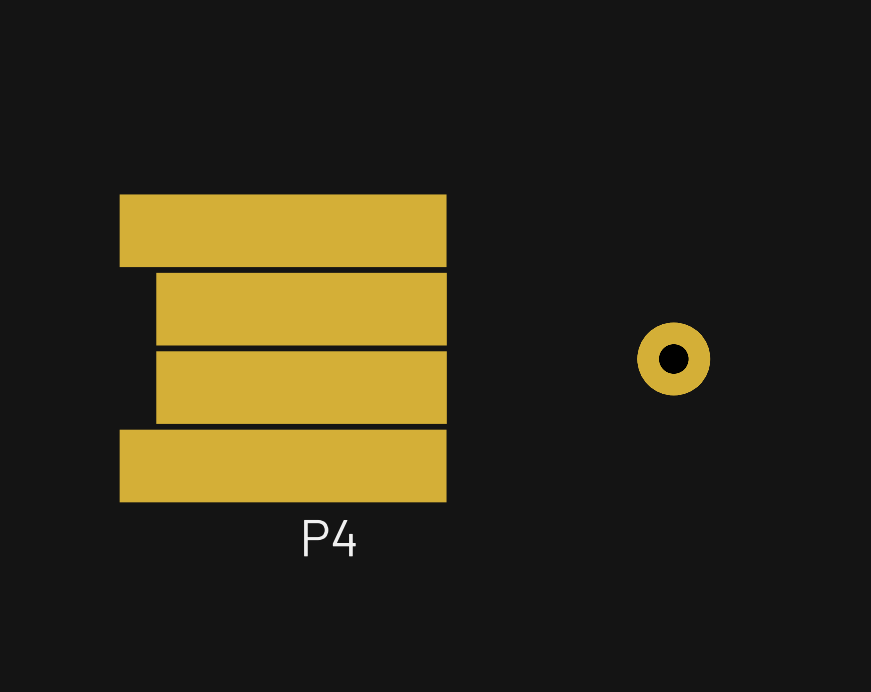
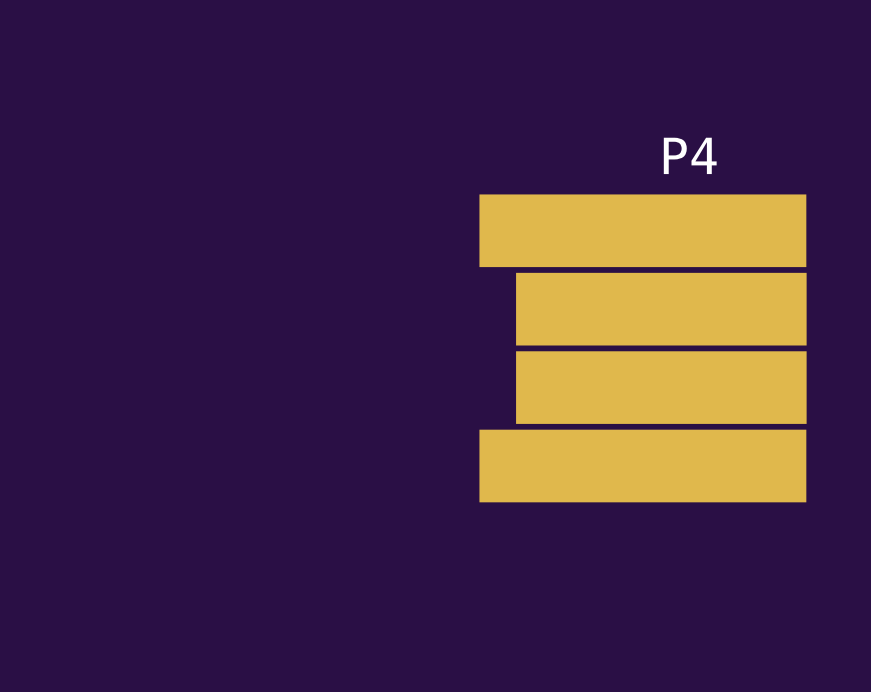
P4 side: top (283, 348) -> bottom (643, 348)
part: (673, 358) -> none

